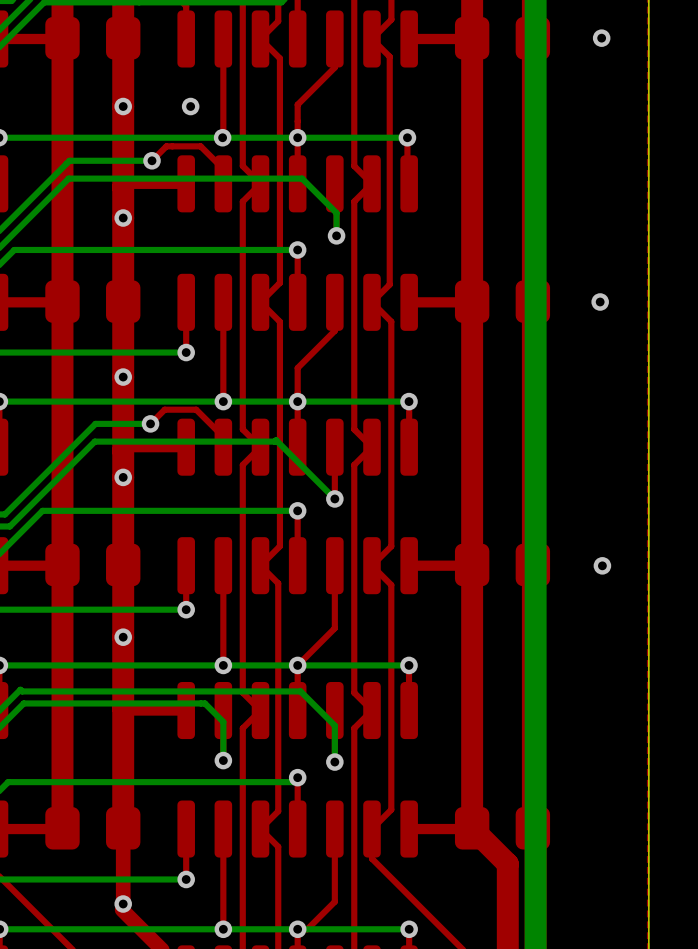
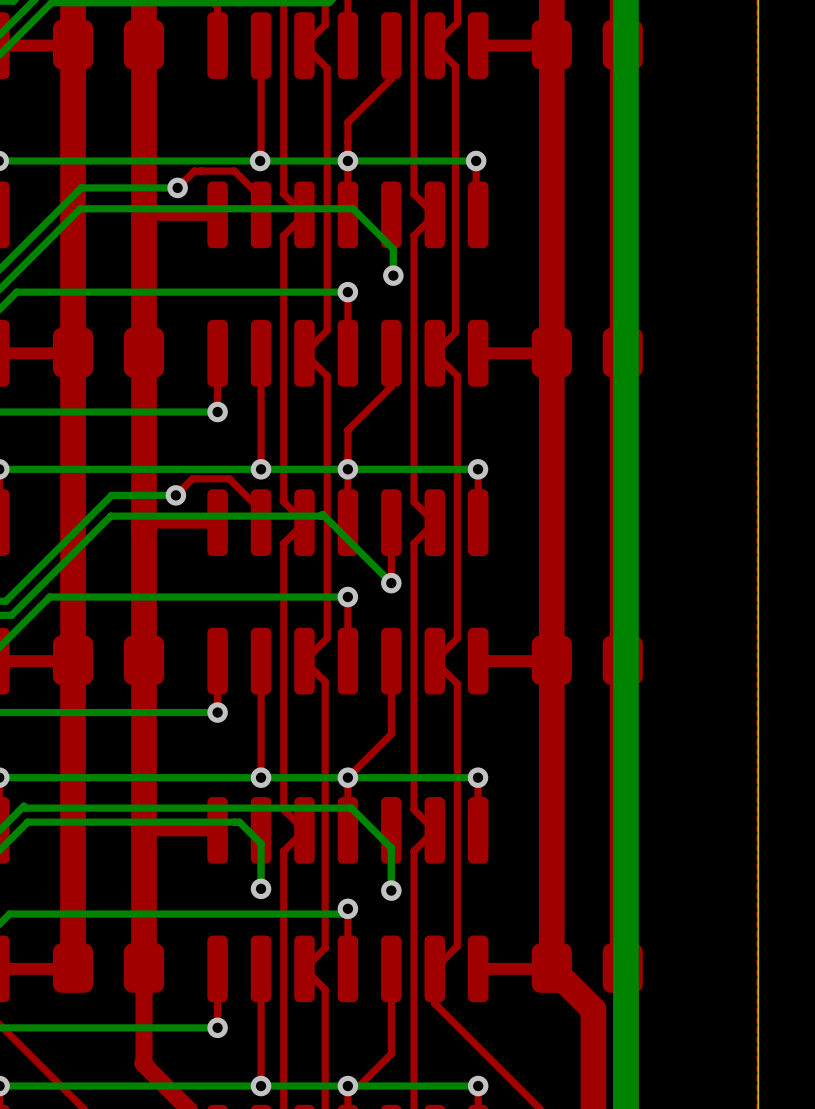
via: (601, 38) -> none
via: (123, 106) -> none
via: (190, 106) -> none
via: (123, 218) -> none
via: (600, 301) -> none
via: (123, 377) -> none
via: (123, 477) -> none
via: (602, 565) -> none
via: (123, 637) -> none
via: (123, 904) -> none

